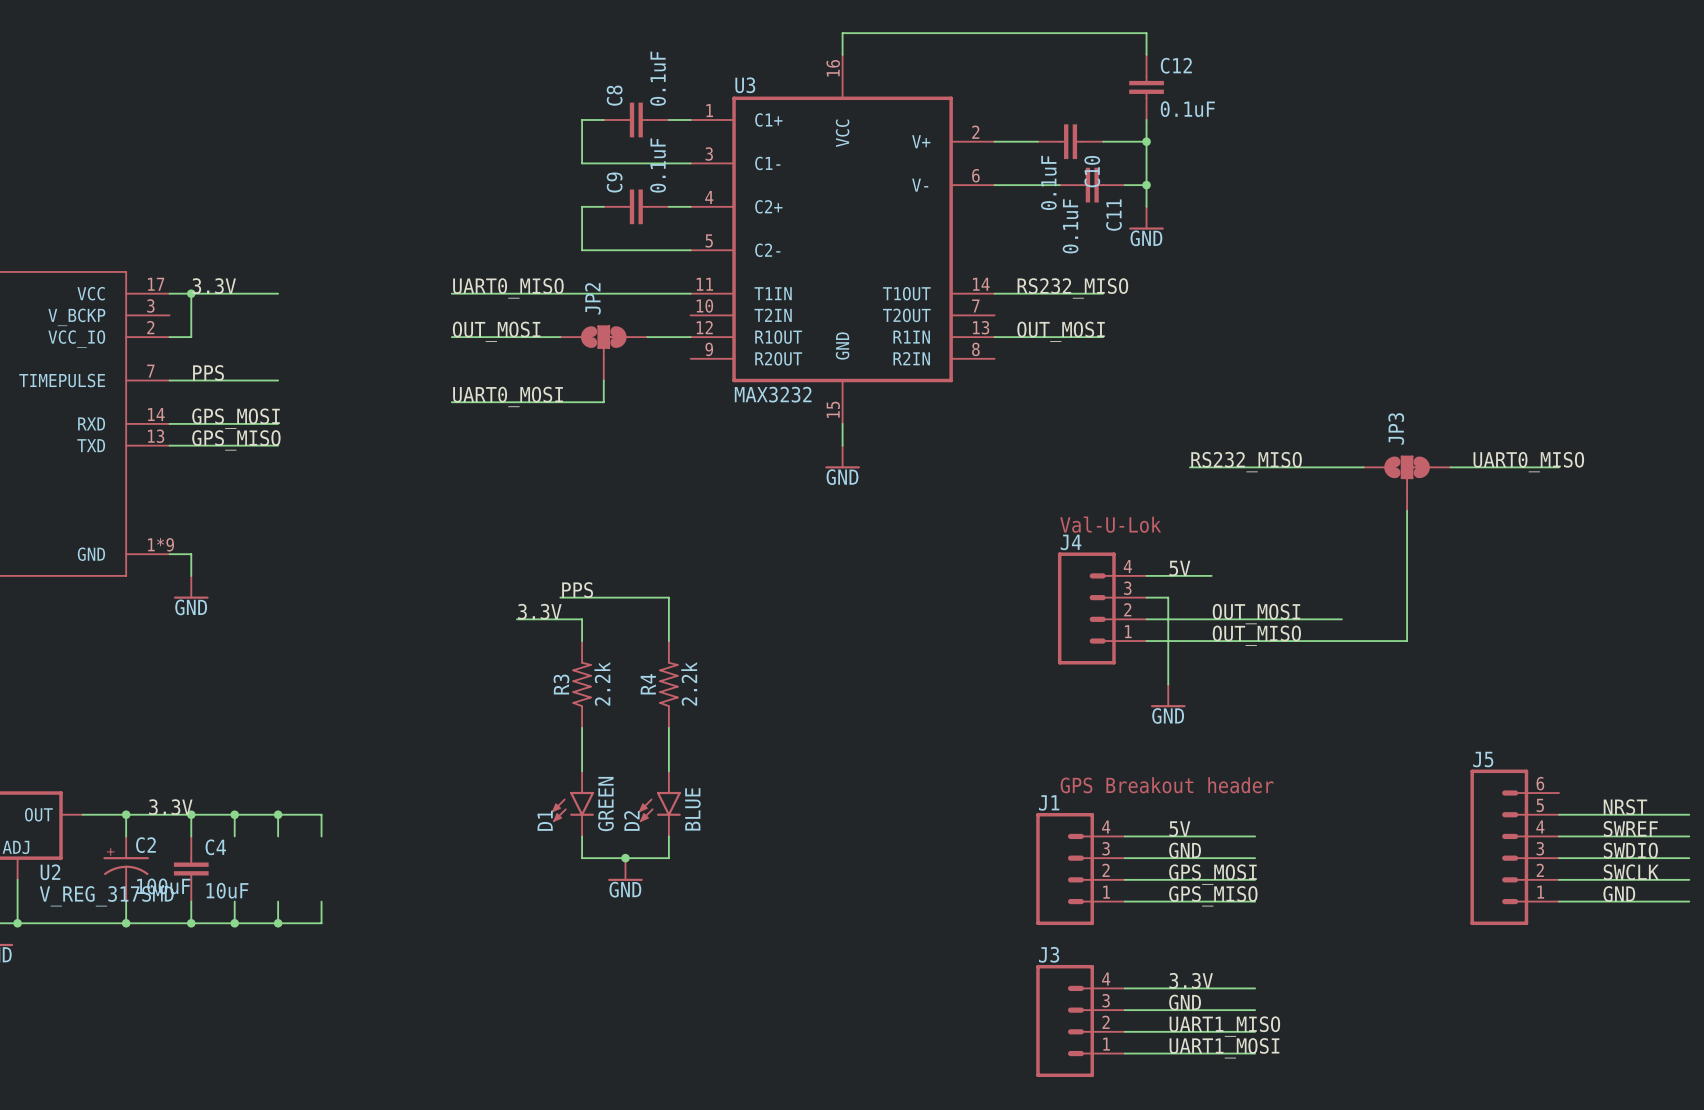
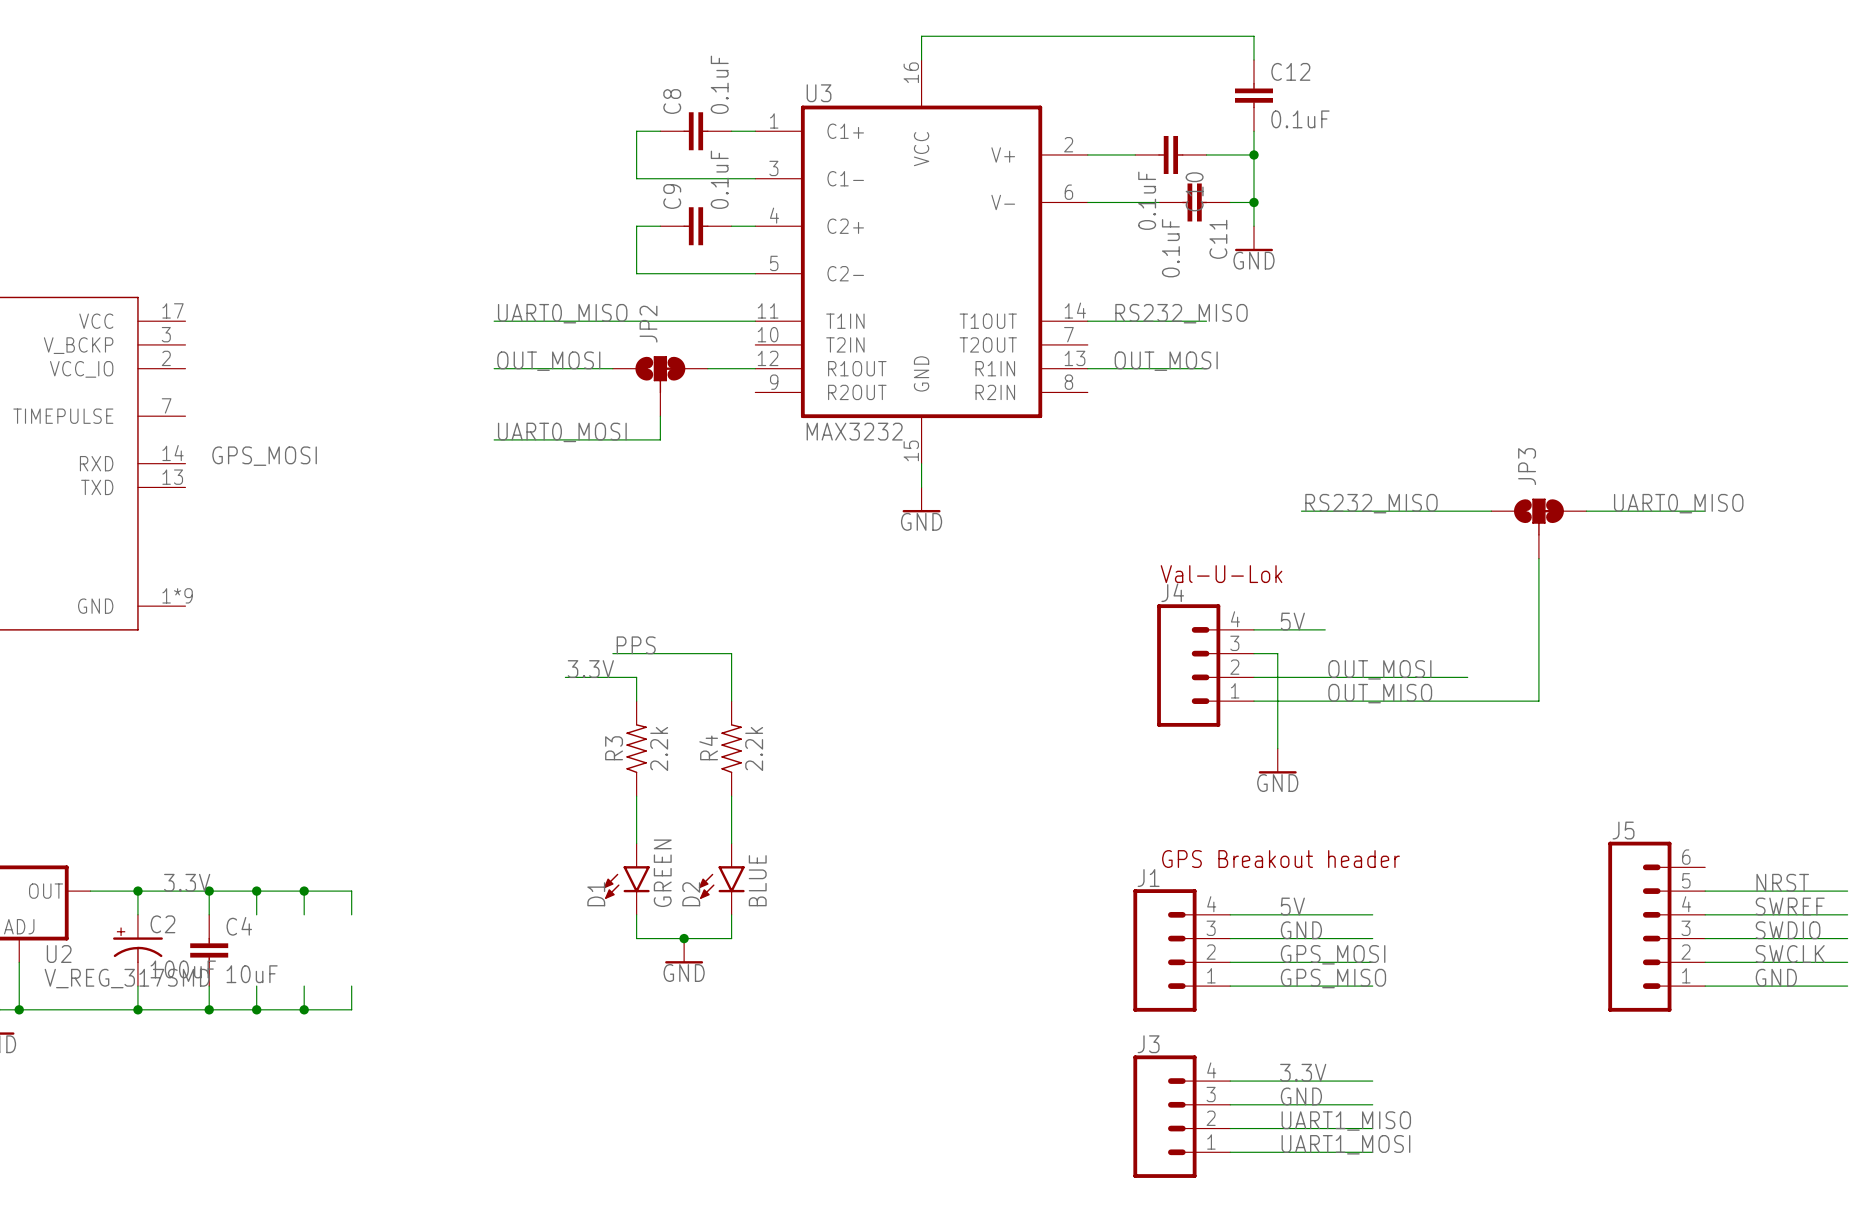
label: 3.3V (214, 286) -> none
wire: (169, 293) (278, 293) -> none
wire: (191, 293) (191, 337) (169, 337) -> none
junction: (191, 293) -> none
label: PPS (208, 372) -> none
wire: (169, 380) (278, 380) -> none
wire: (169, 423) (278, 423) -> none
label: GPS_MISO (236, 440) -> none
wire: (169, 445) (278, 445) -> none
wire: (169, 554) (191, 554) (191, 575) -> none
power symbol: GND (191, 587) -> none

